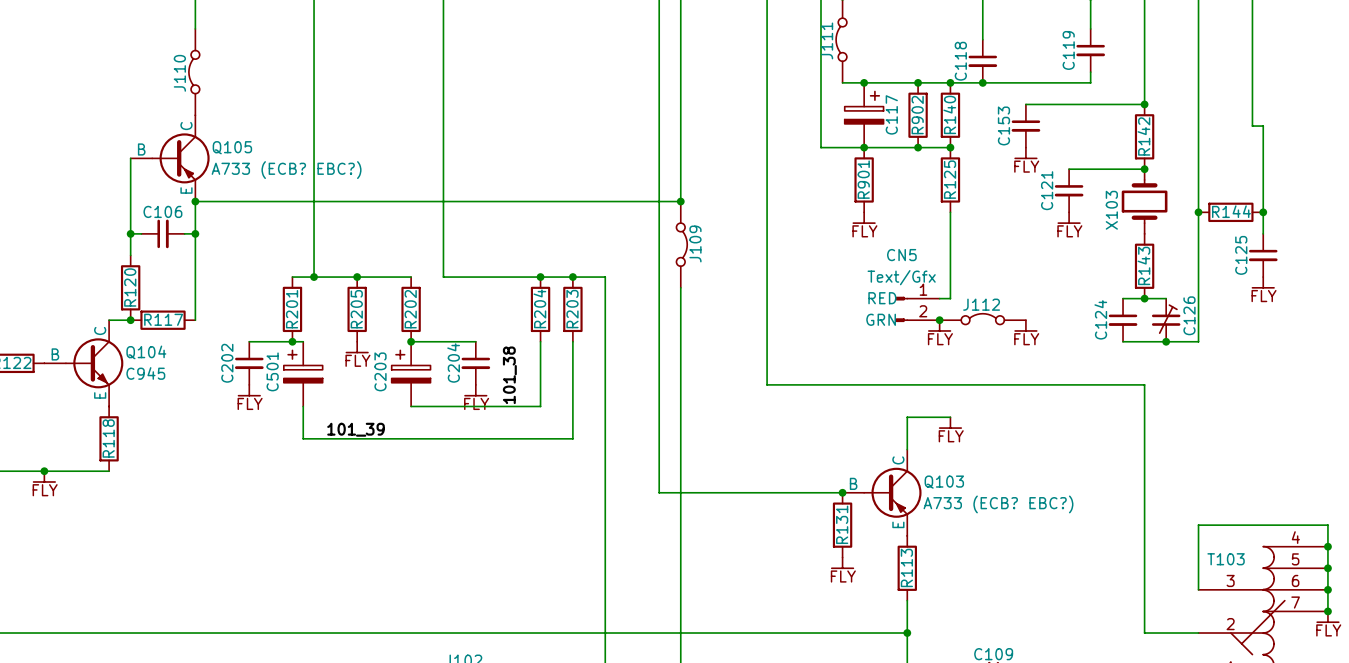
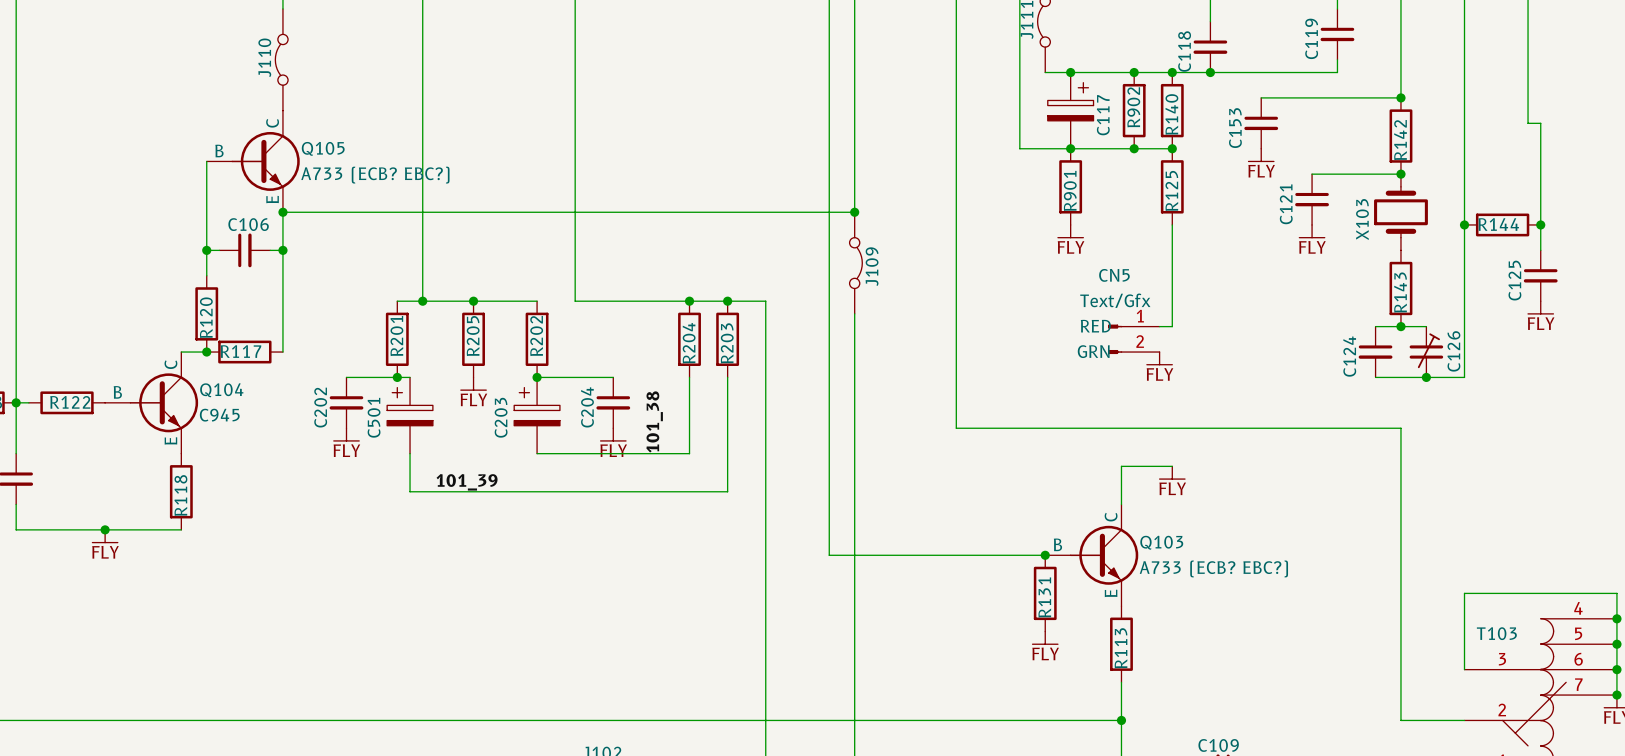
Q105 symbol: [130, 115, 210, 202] -> [206, 110, 300, 213]
J112: (982, 319) -> none
junction: (939, 320) -> none
power symbol: (1025, 325) -> none
Q103 symbol: [842, 449, 922, 536] -> [1045, 504, 1139, 607]

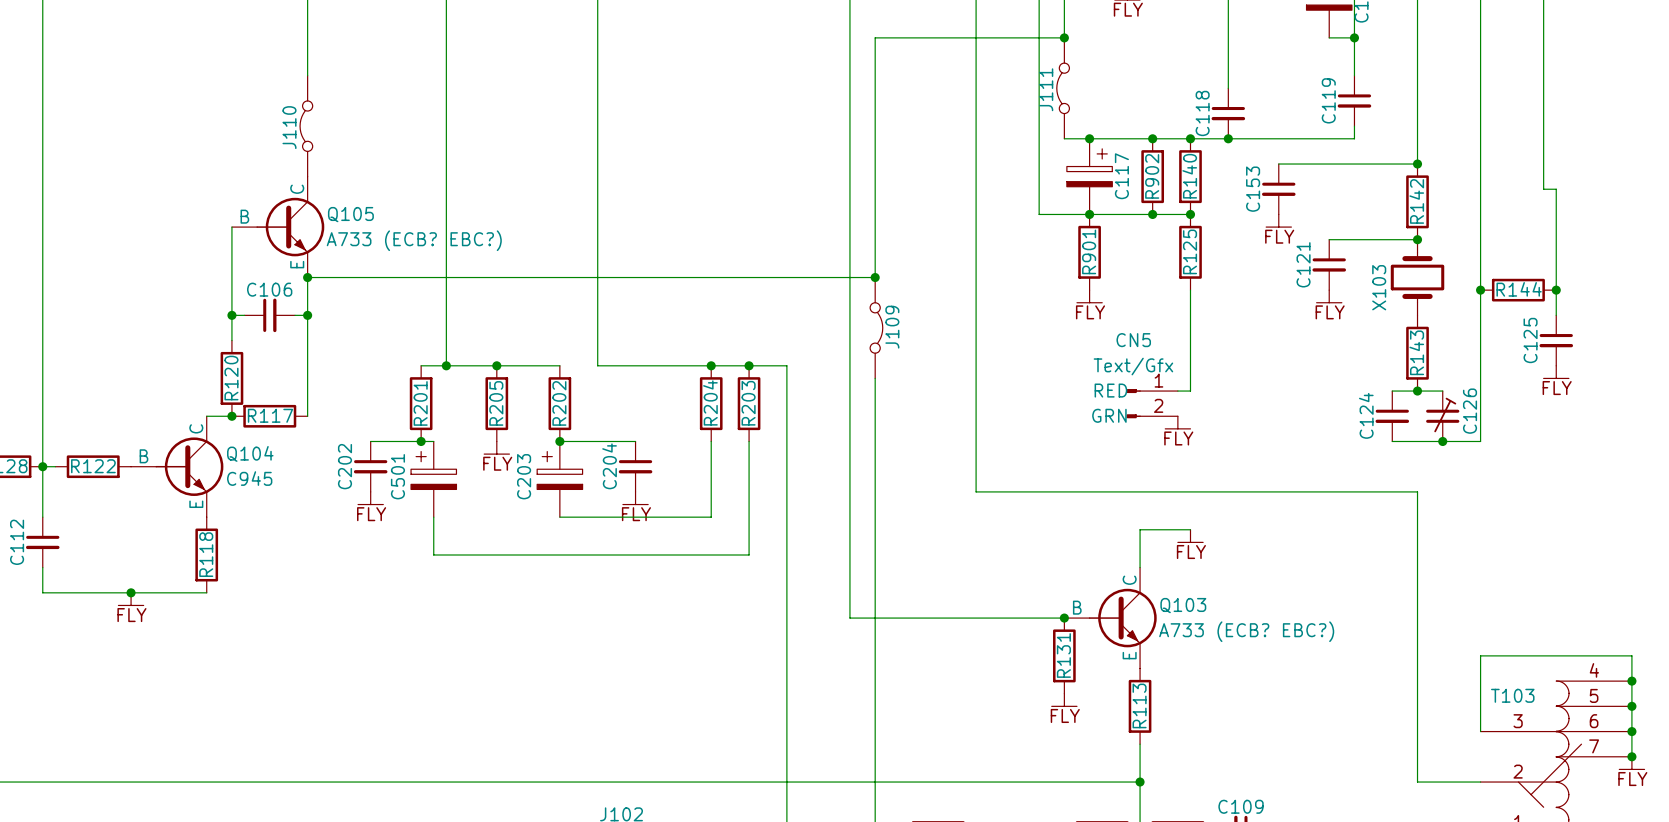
label: 101_38 (654, 421) -> none
label: 101_39 (467, 482) -> none

